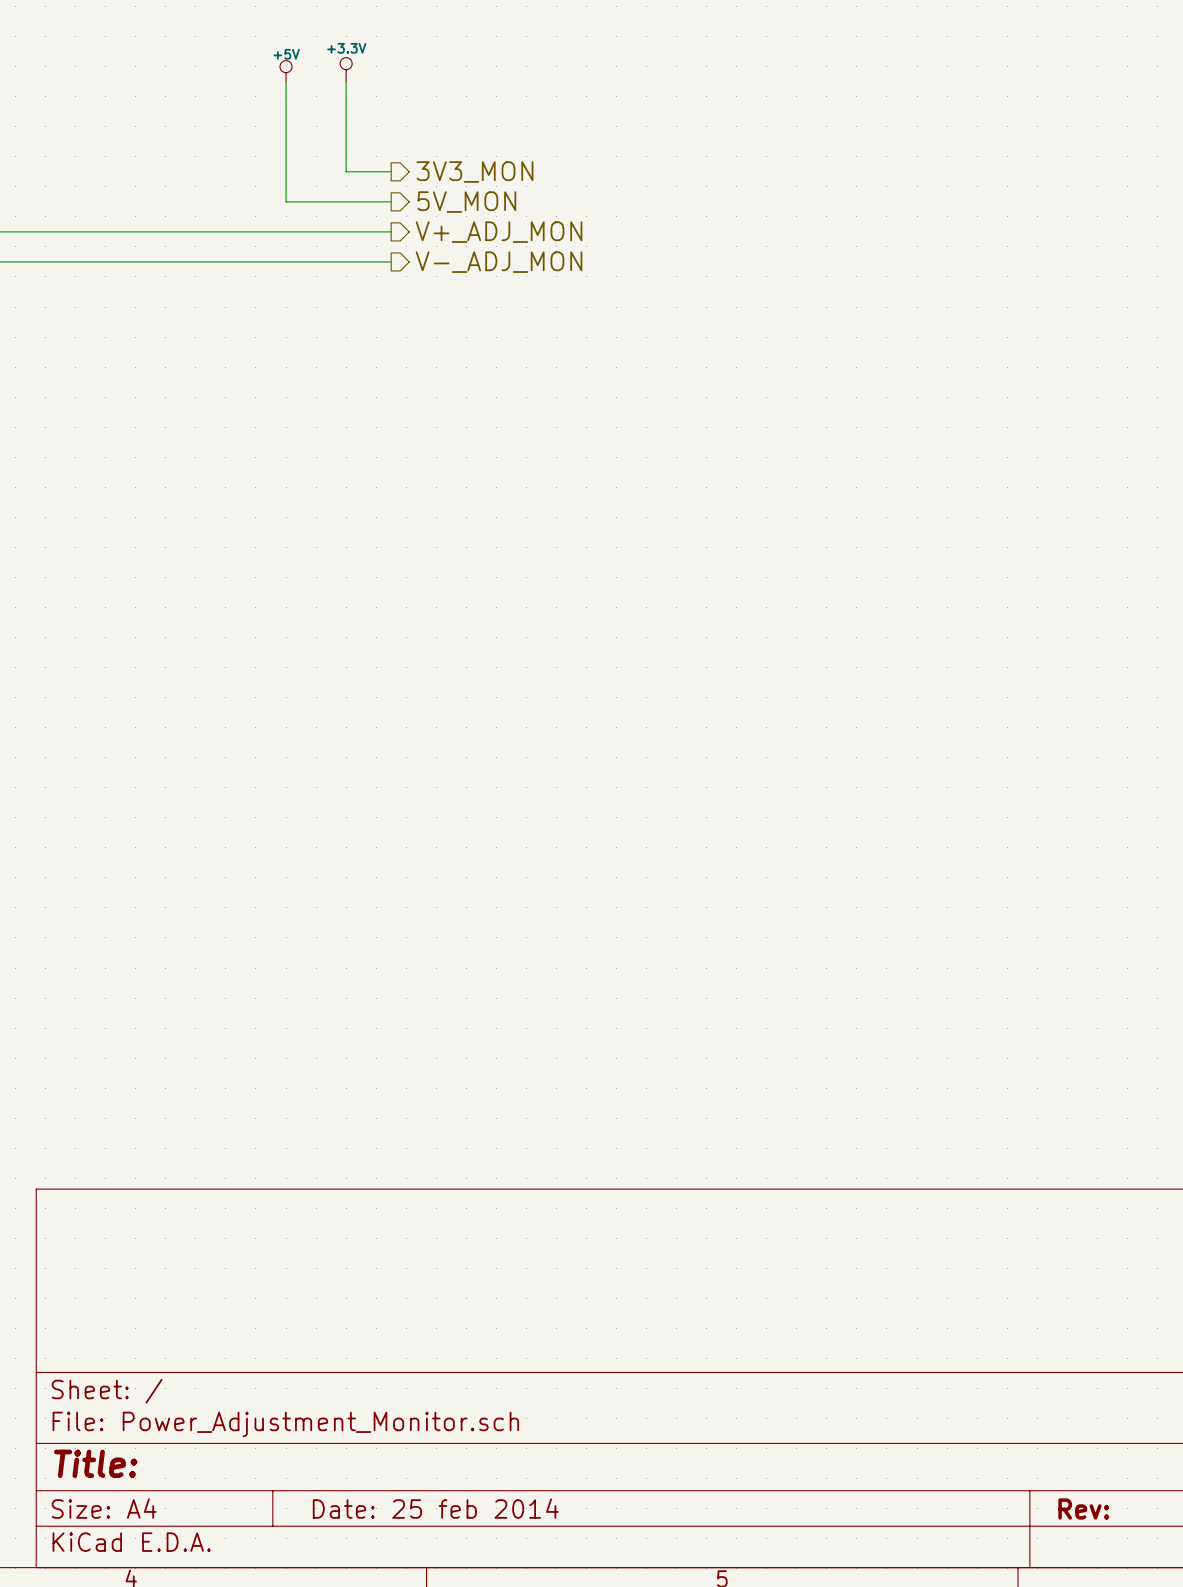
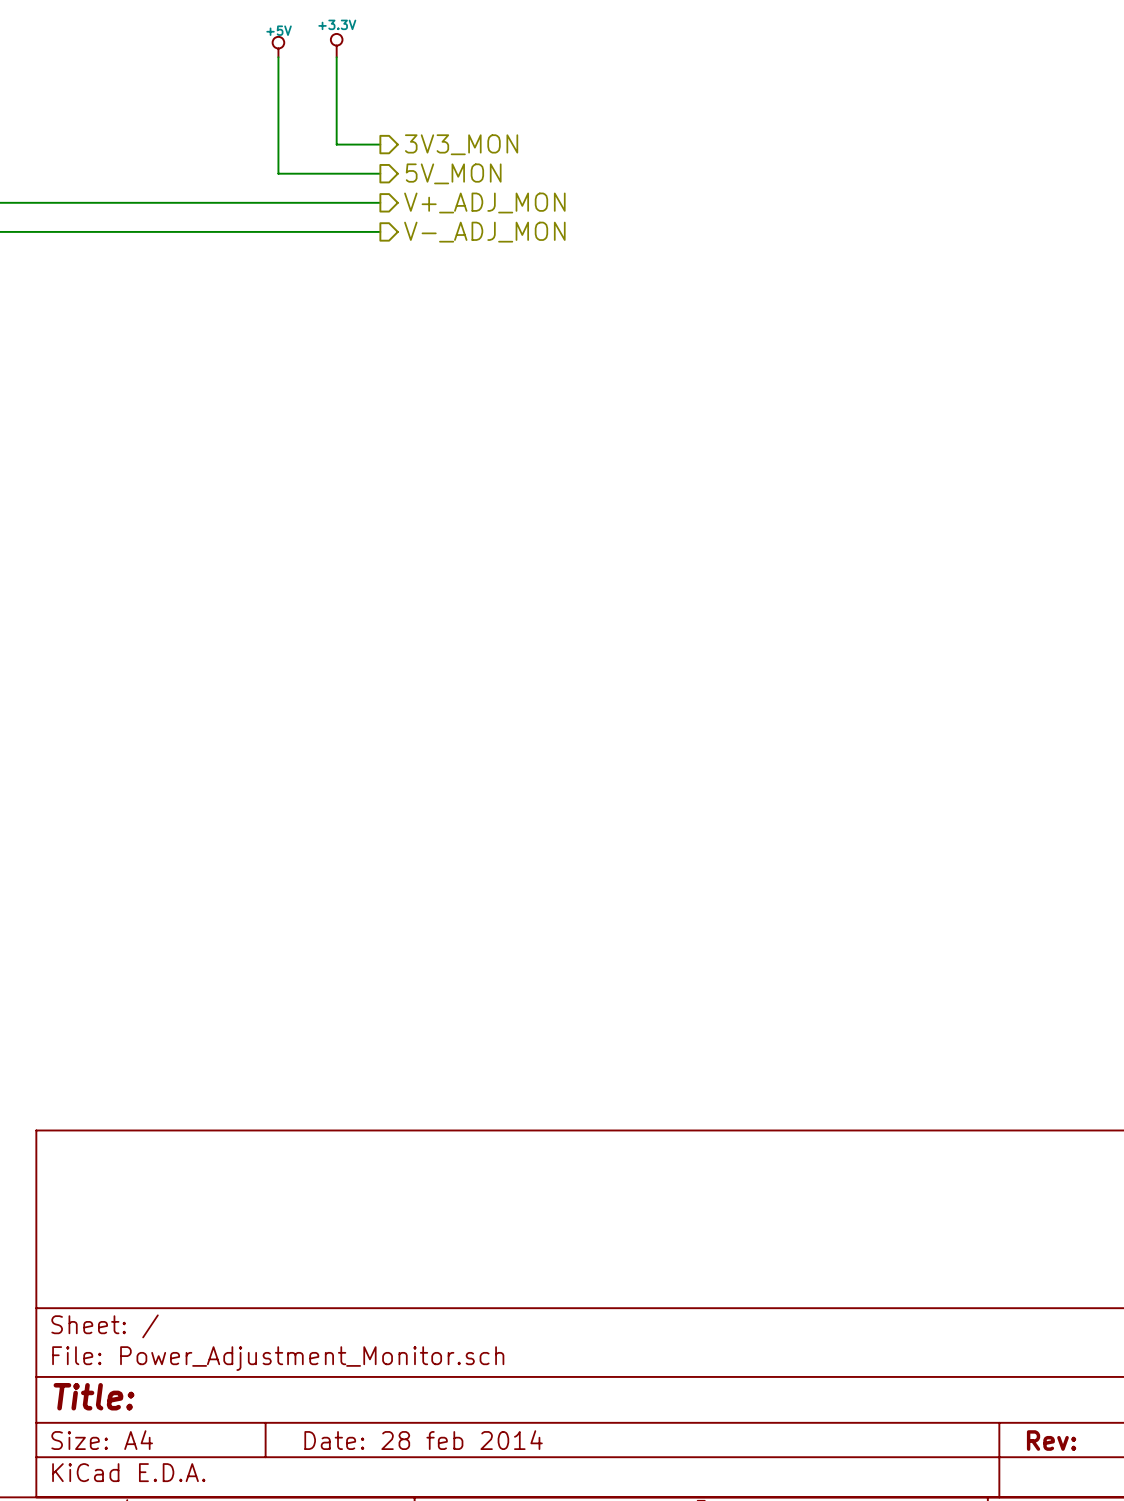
title block: Date: 25 feb 2014 (435, 1508) -> Date: 28 feb 2014 (423, 1440)

